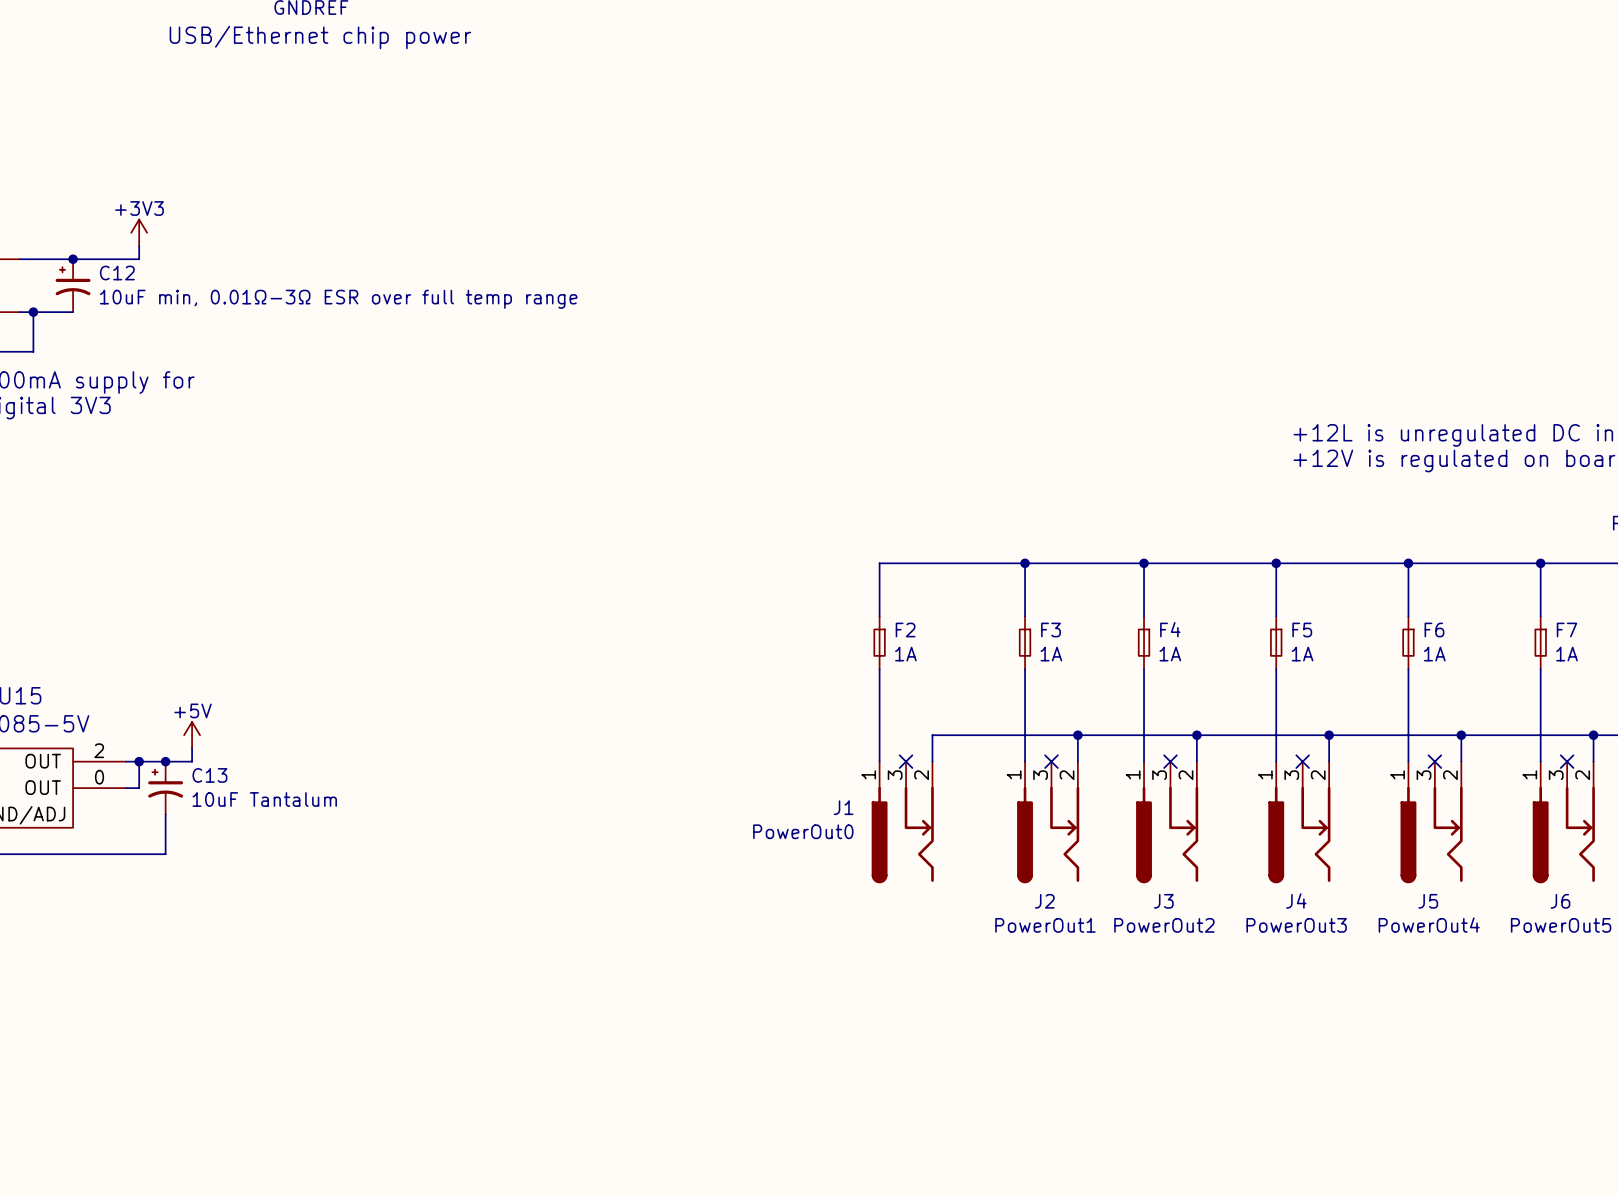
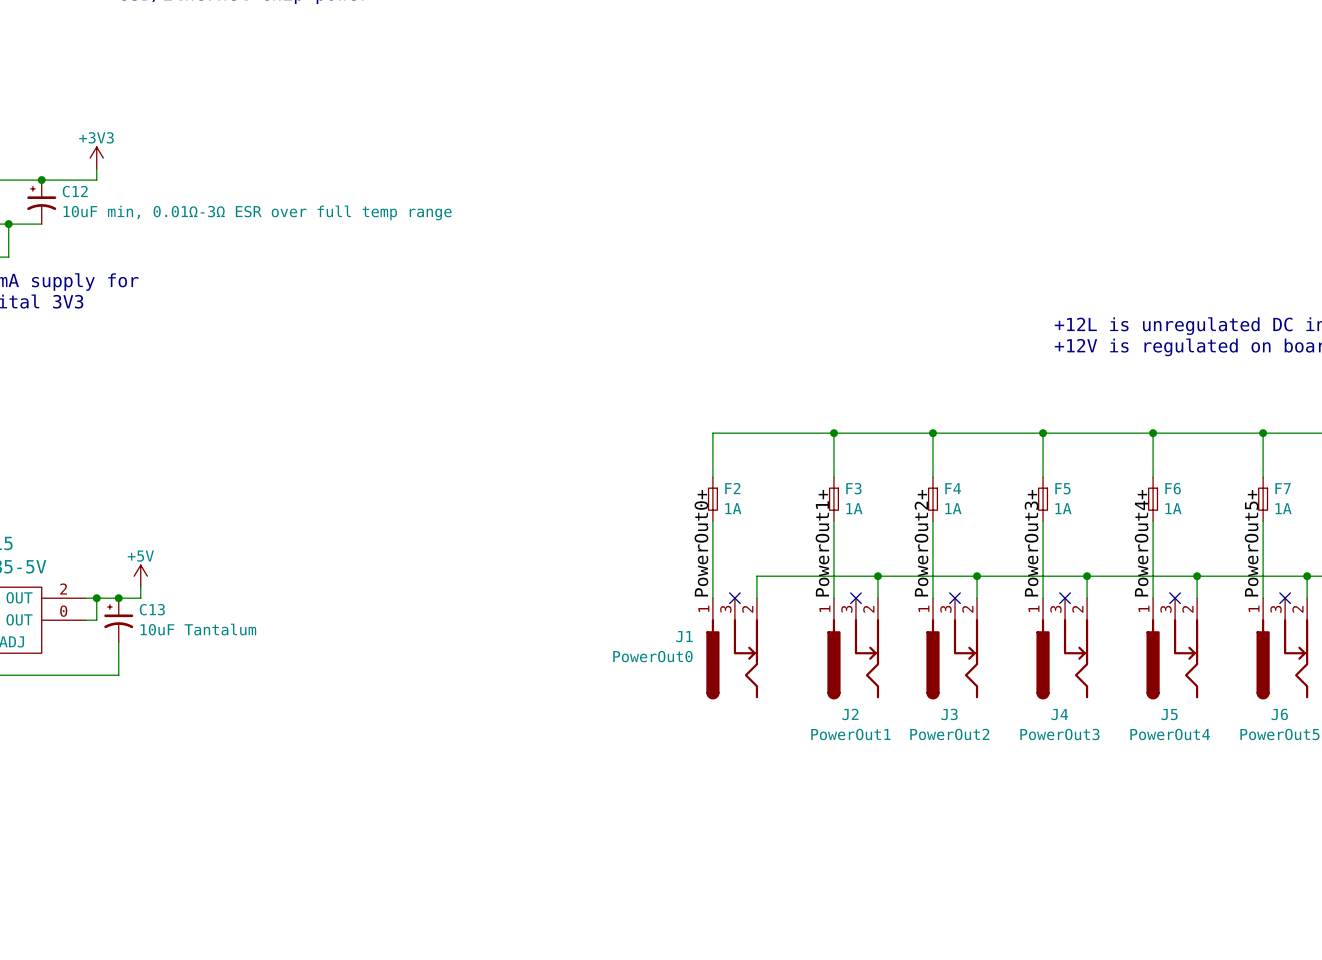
label: none -> PowerOut0+ (701, 543)
label: none -> PowerOut1+ (822, 543)
label: none -> PowerOut2+ (921, 543)
label: none -> PowerOut3+ (1031, 543)
label: none -> PowerOut4+ (1141, 543)
label: none -> PowerOut5+ (1251, 543)

